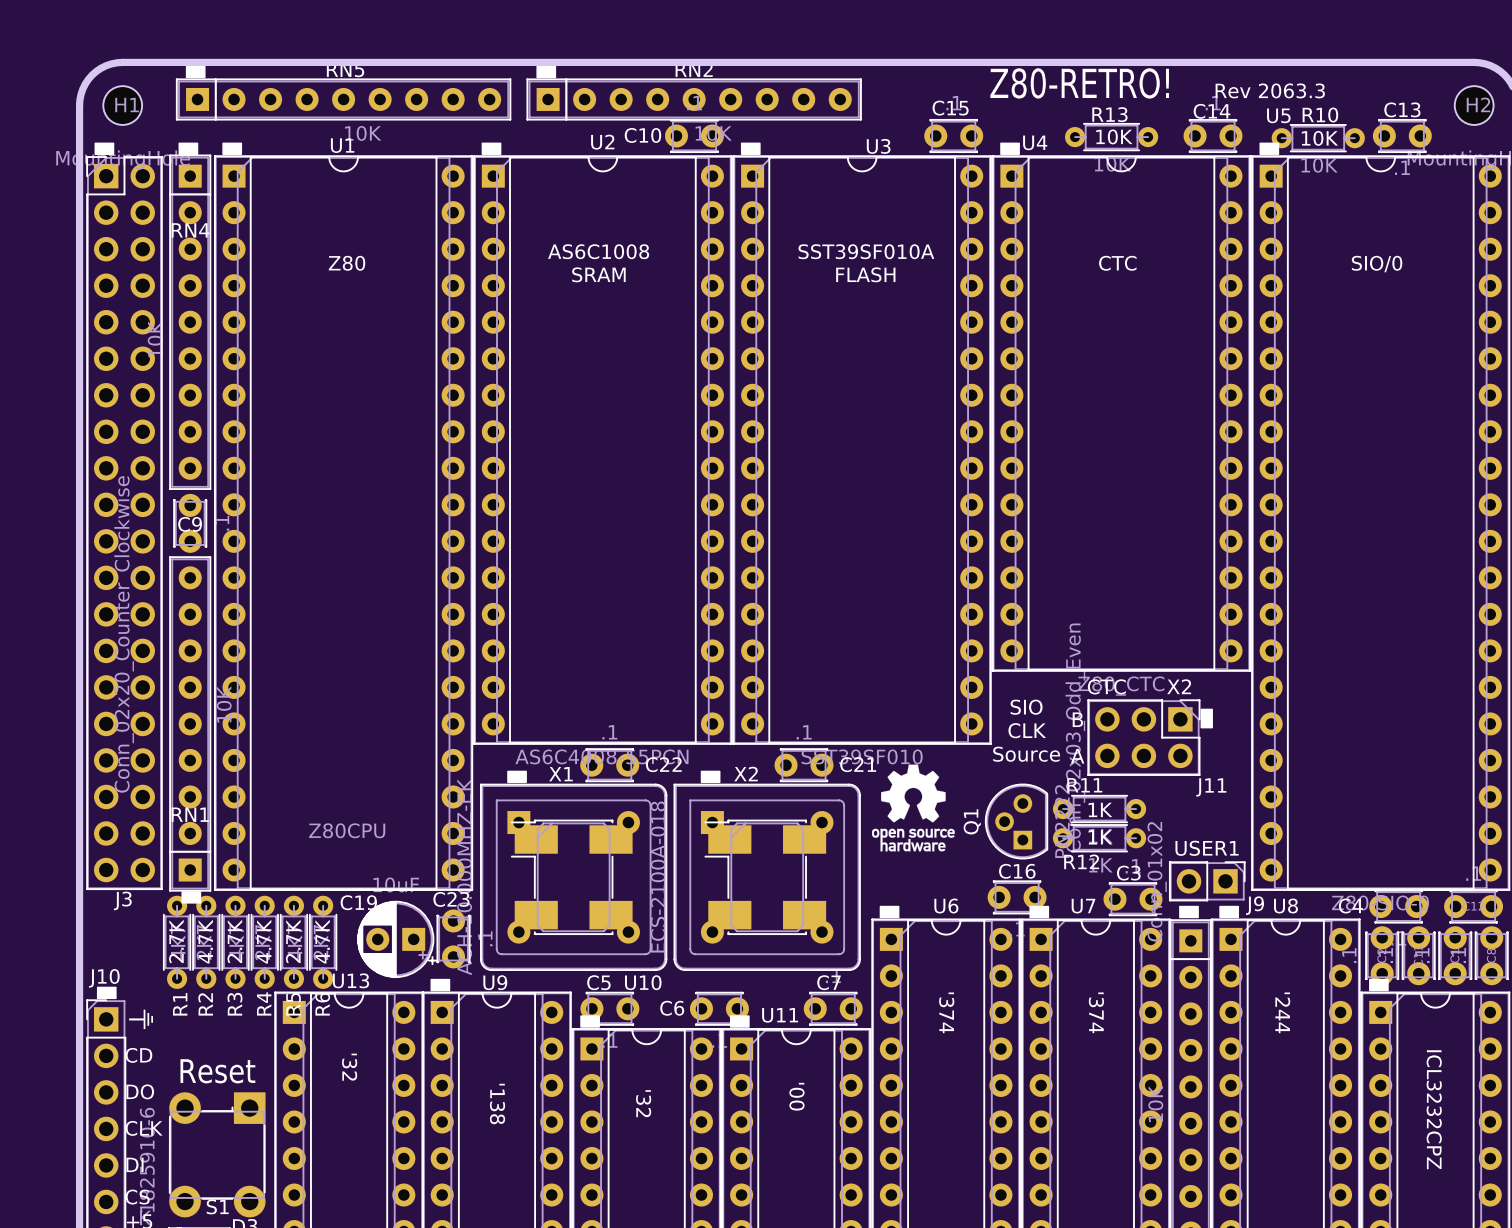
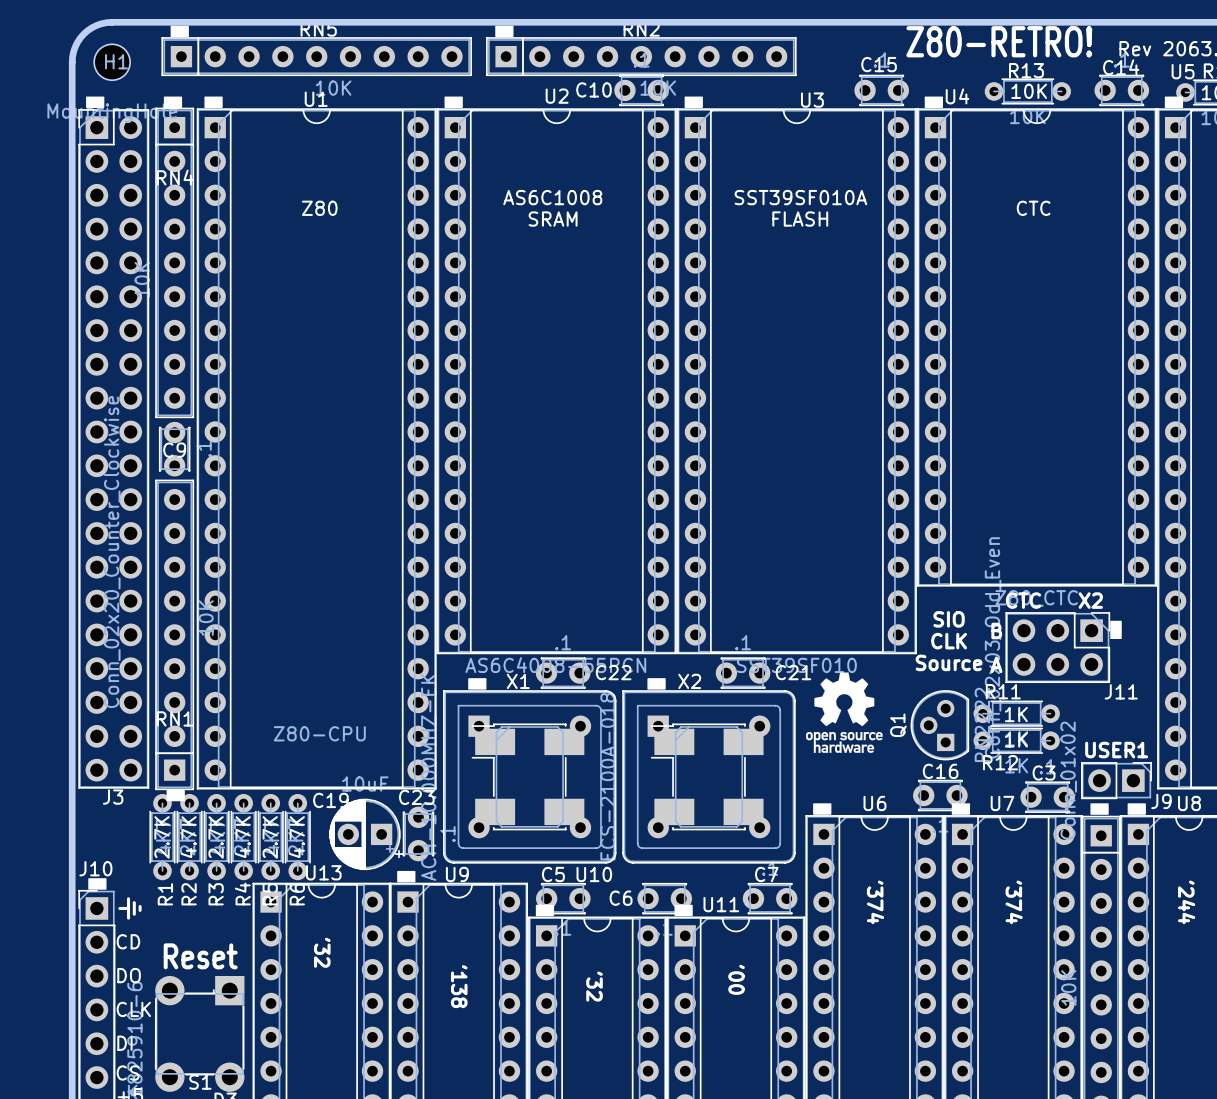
U1 value: Z80CPU (347, 830) -> Z80-CPU (319, 733)

